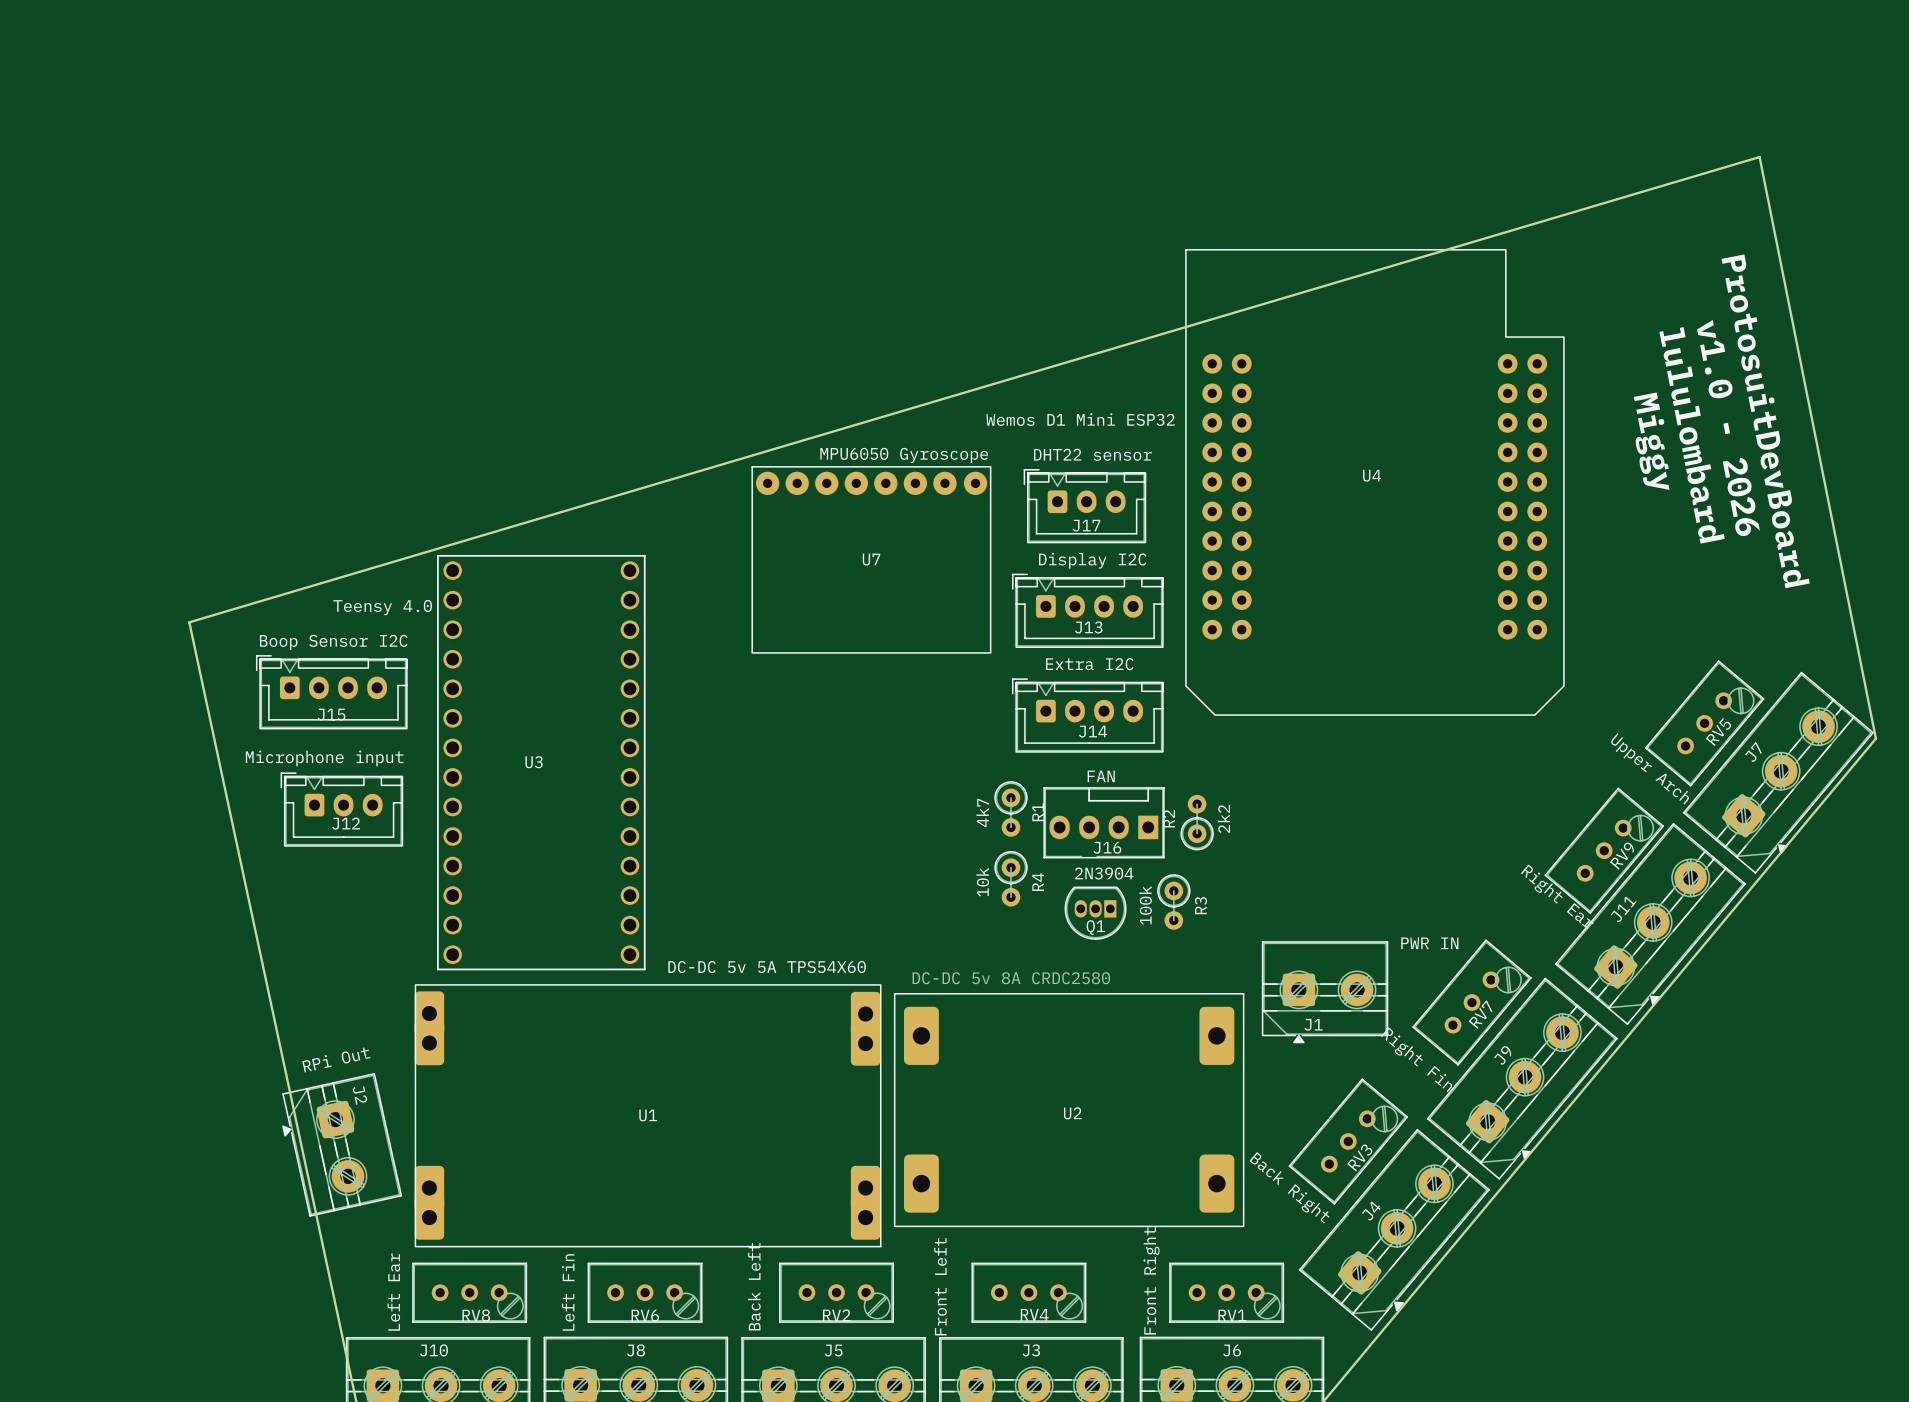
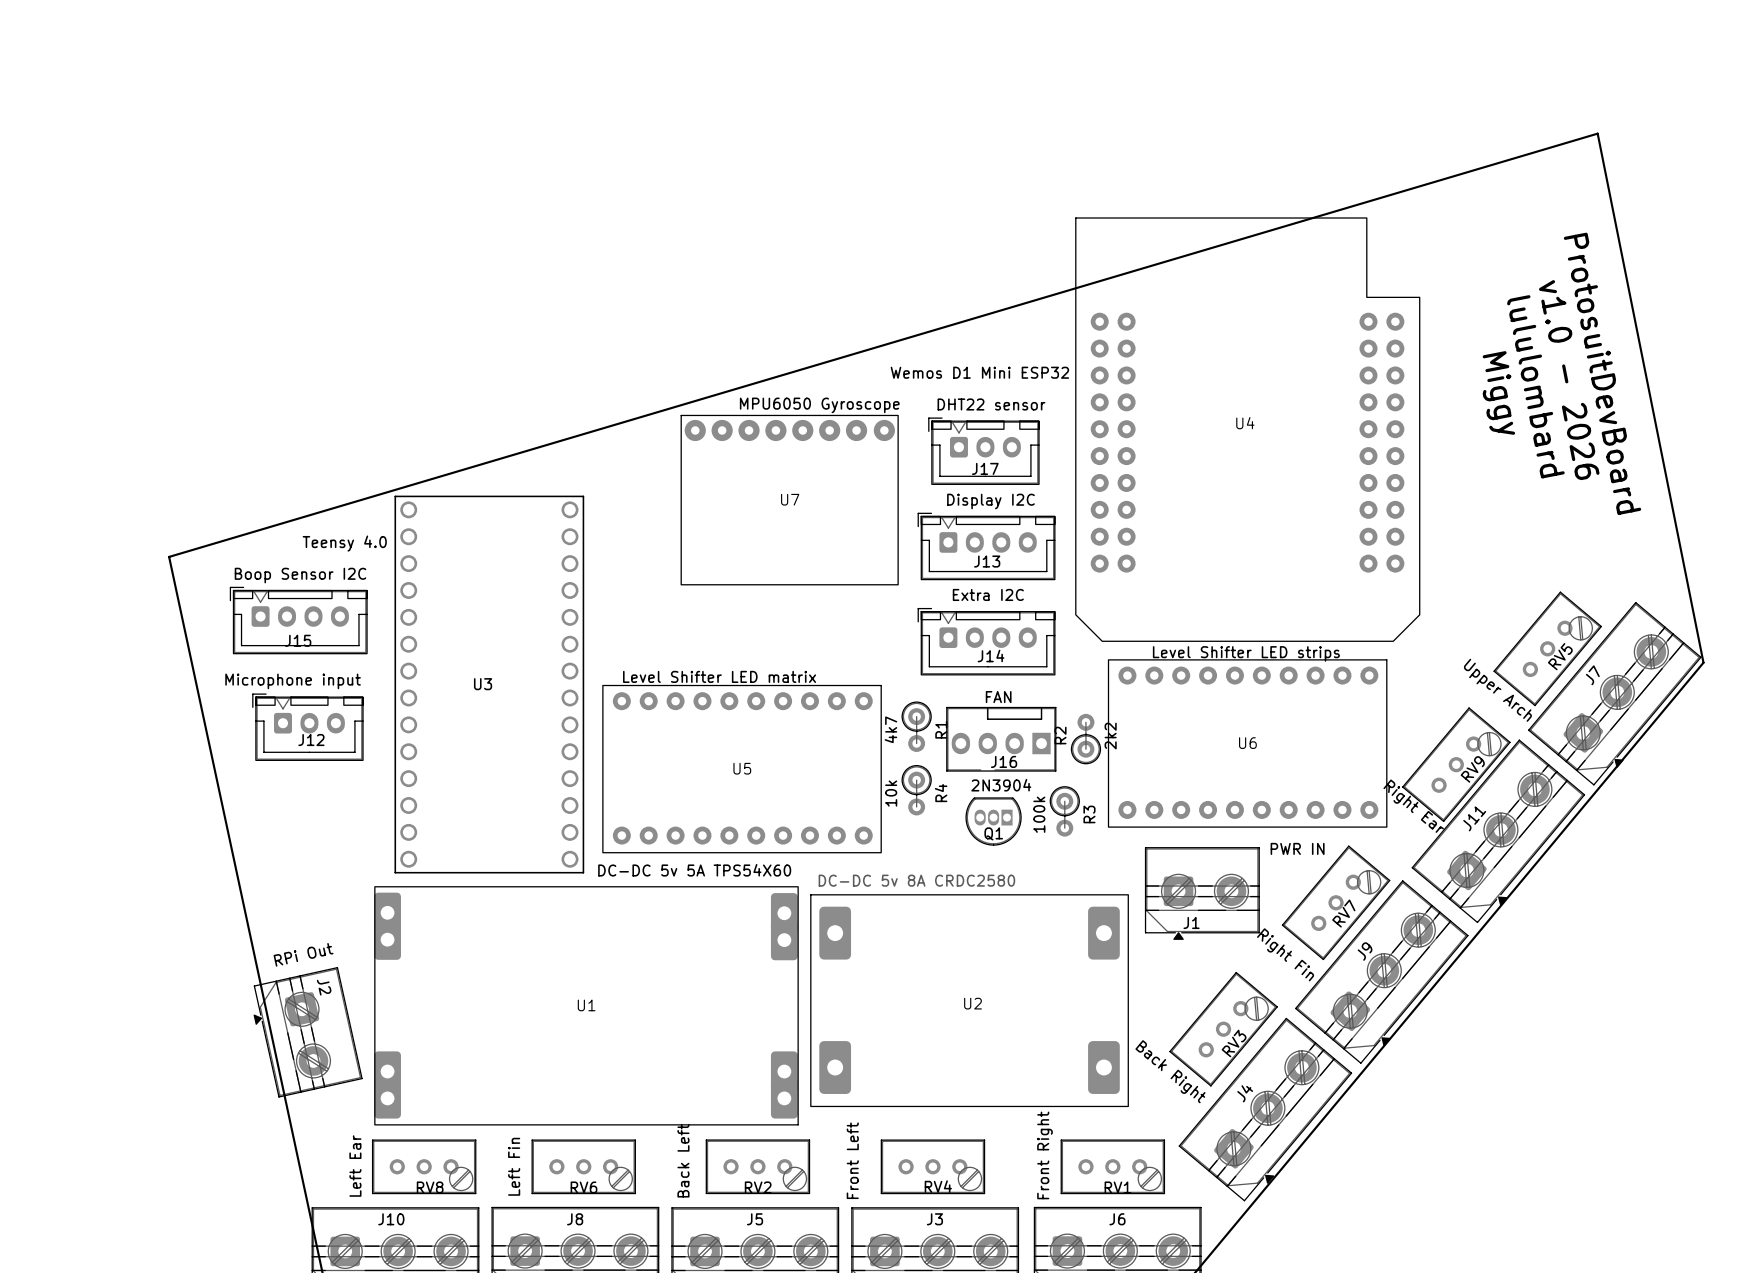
U6: none -> Level Shifter LED strips (1247, 743)
U5: none -> Level Shifter LED matrix (742, 769)

